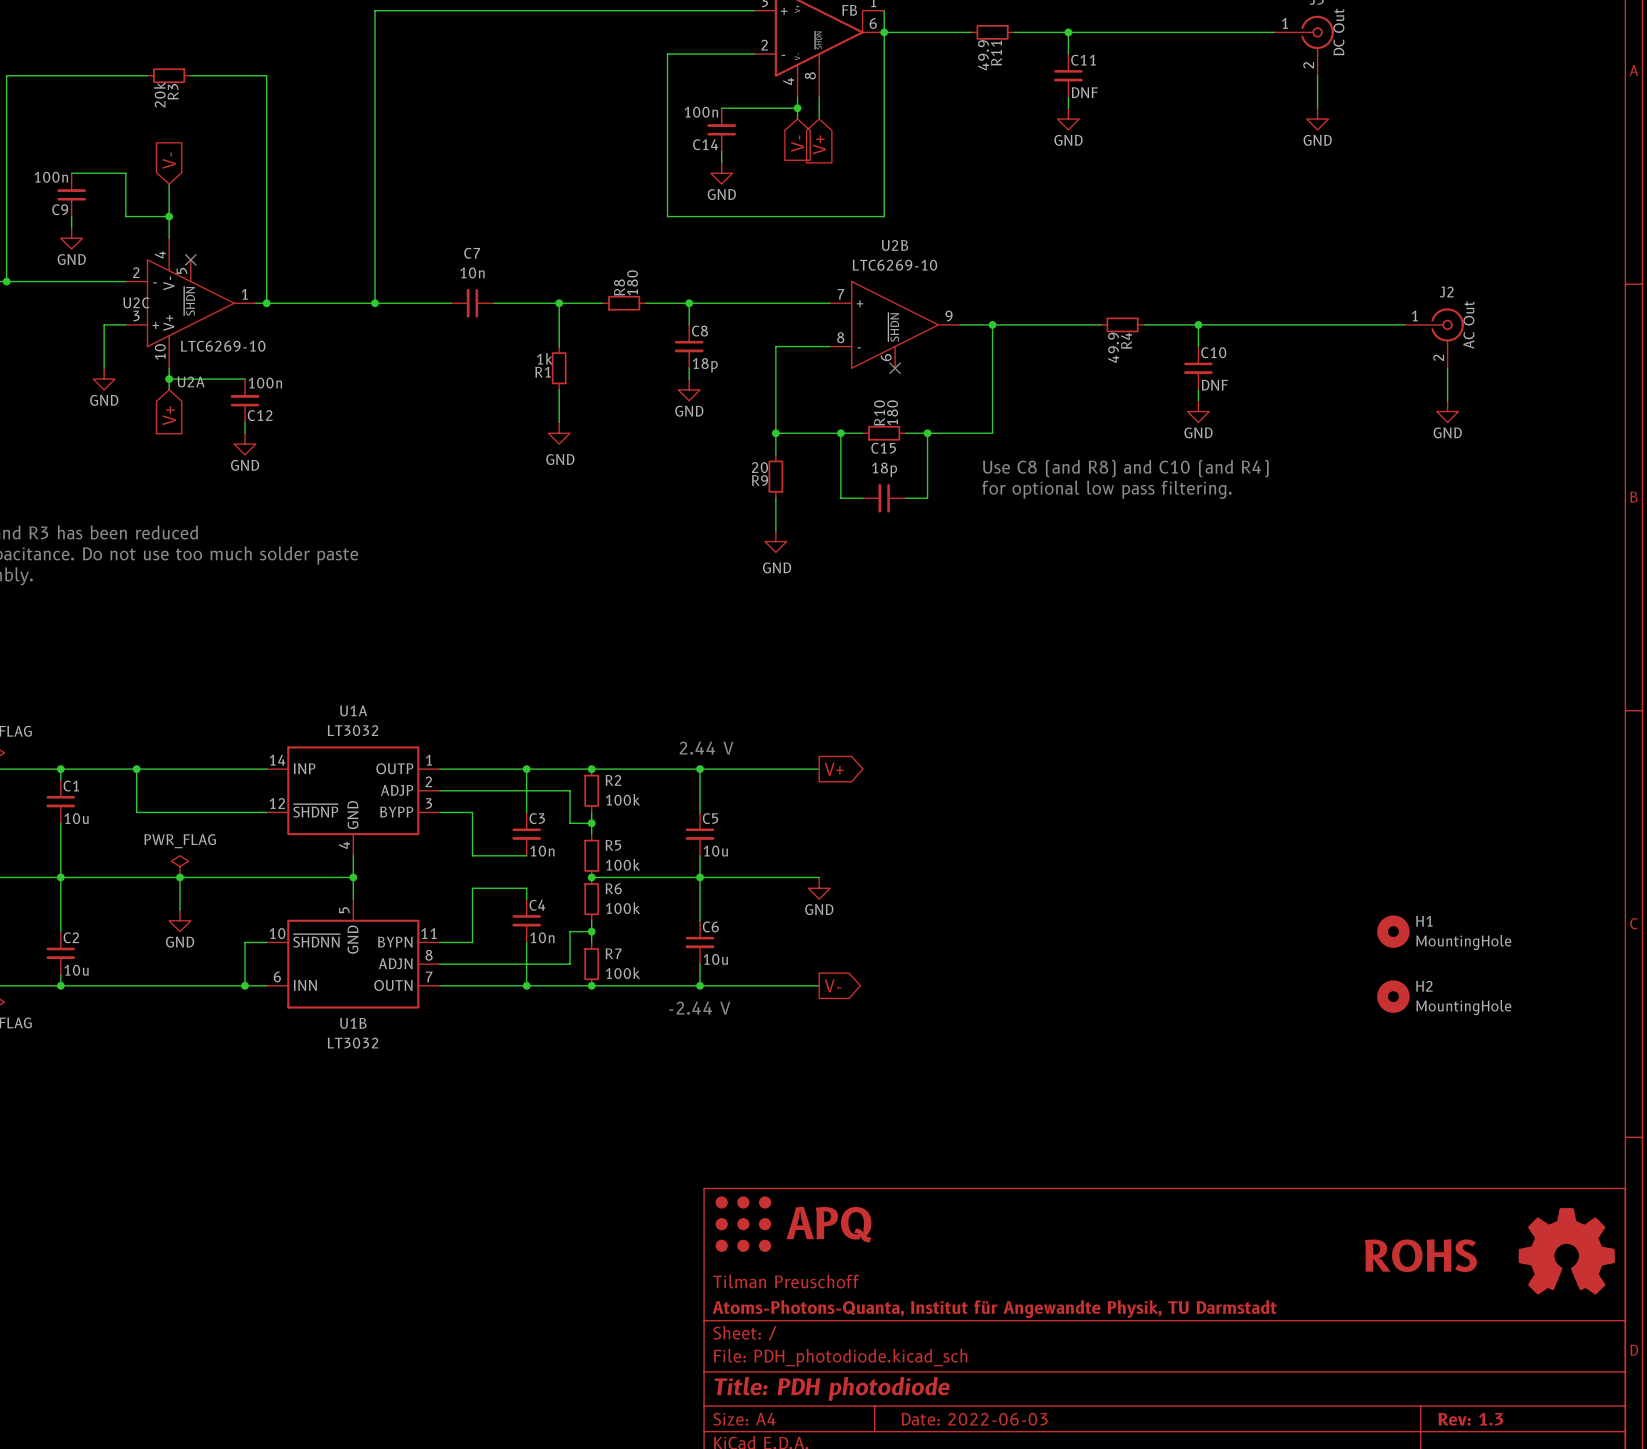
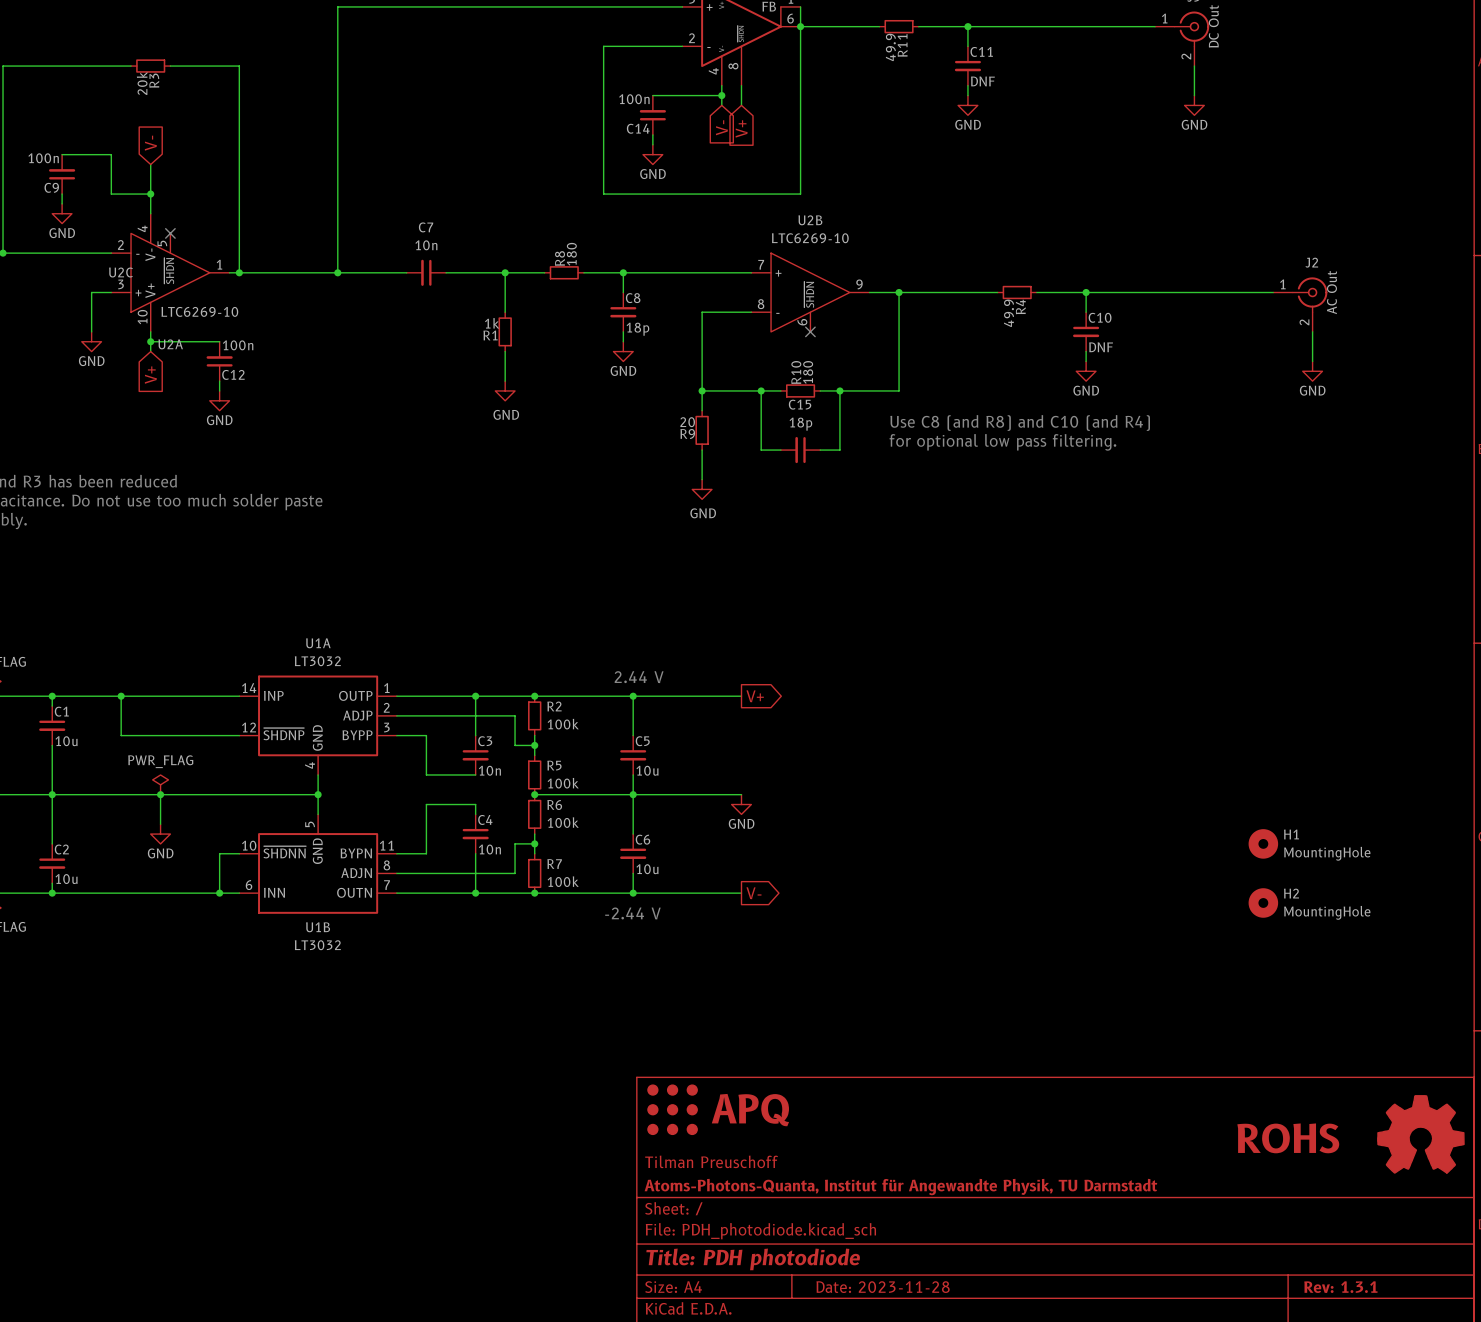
title block: Date: 2022-06-03 (974, 1419) -> Date: 2023-11-28 (883, 1287)
title block: Rev: 1.3 (1470, 1419) -> Rev: 1.3.1 (1340, 1287)

